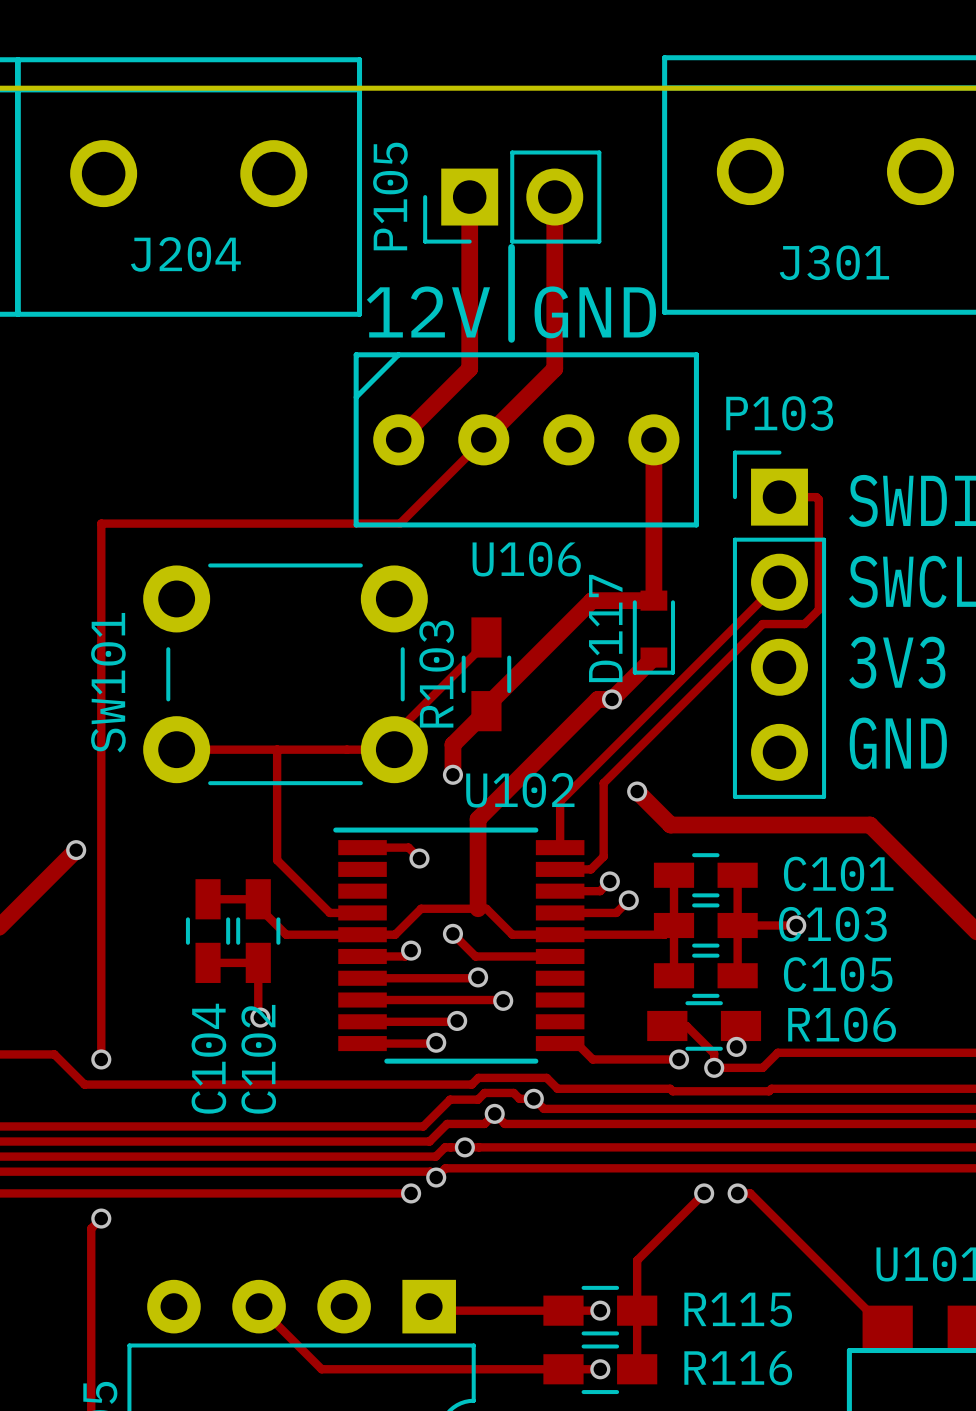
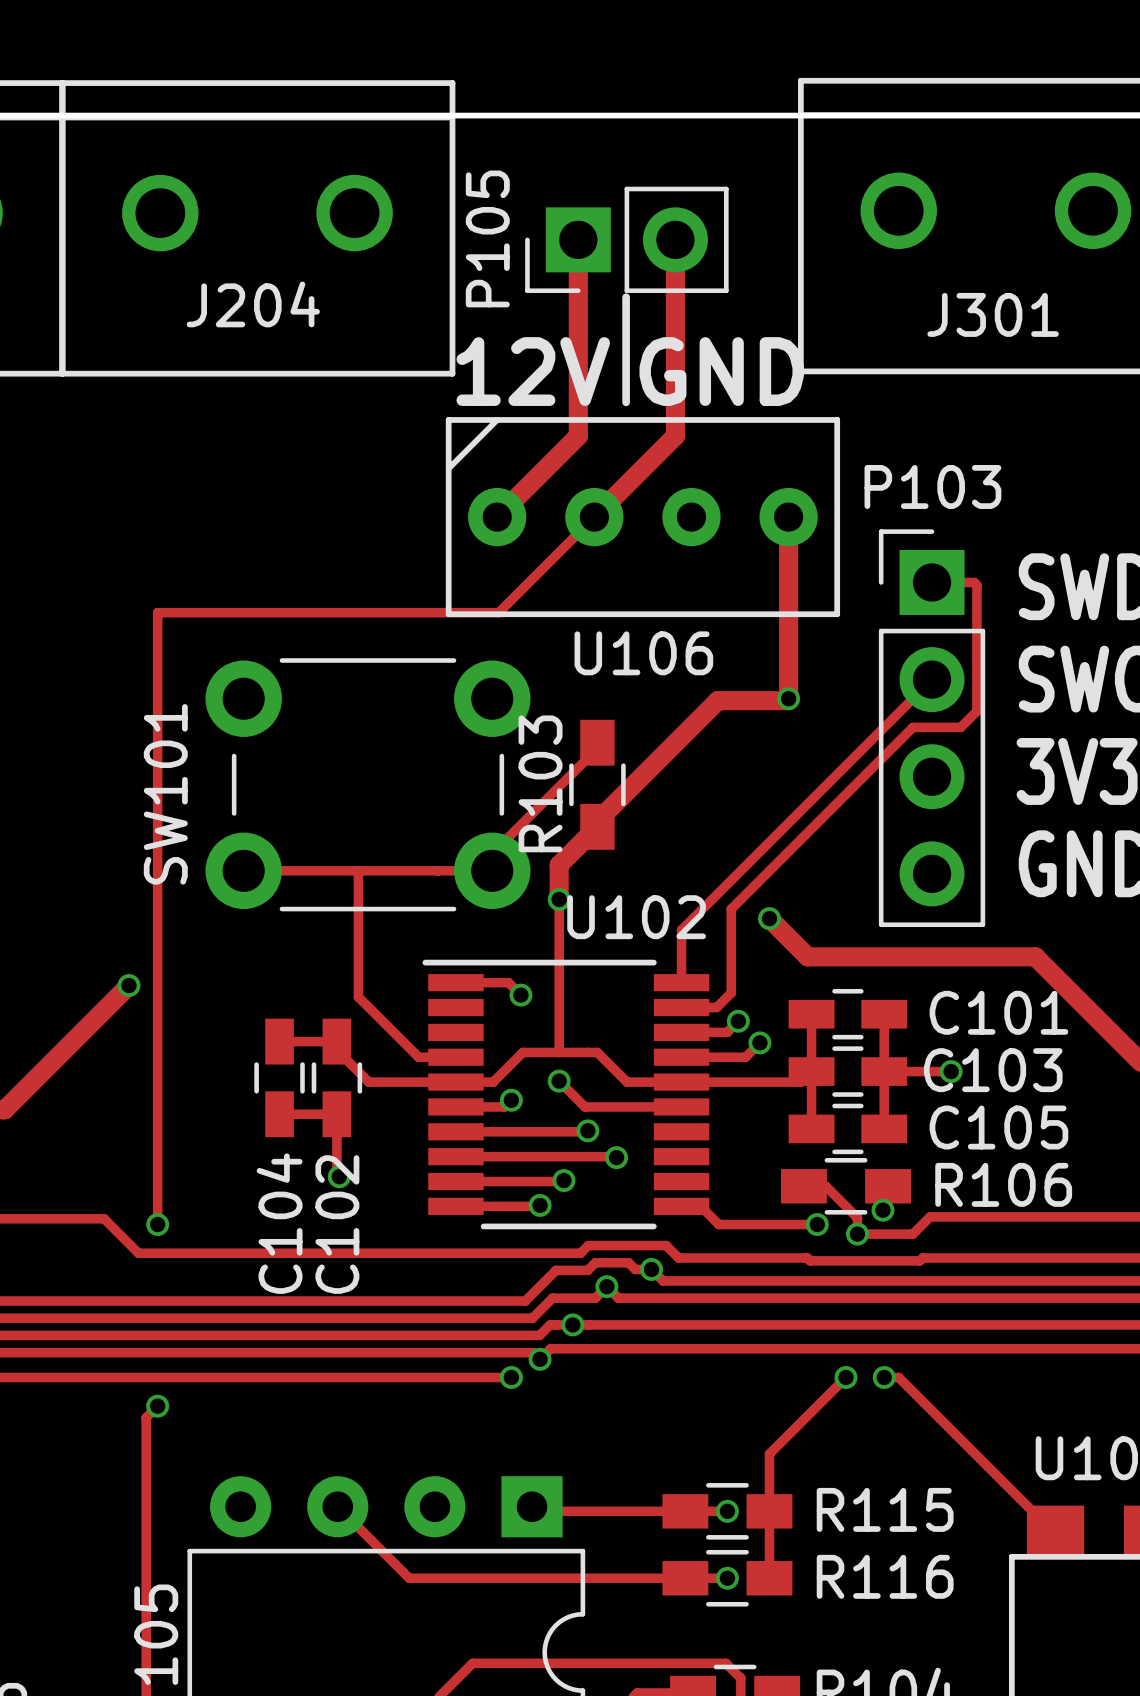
D117: (653, 632) -> none
track: (653, 657) (612, 699) (597, 699) (478, 819) (478, 908) -> none
via position: (612, 699) -> (788, 698)
track: none -> (559, 899) (559, 1052)

